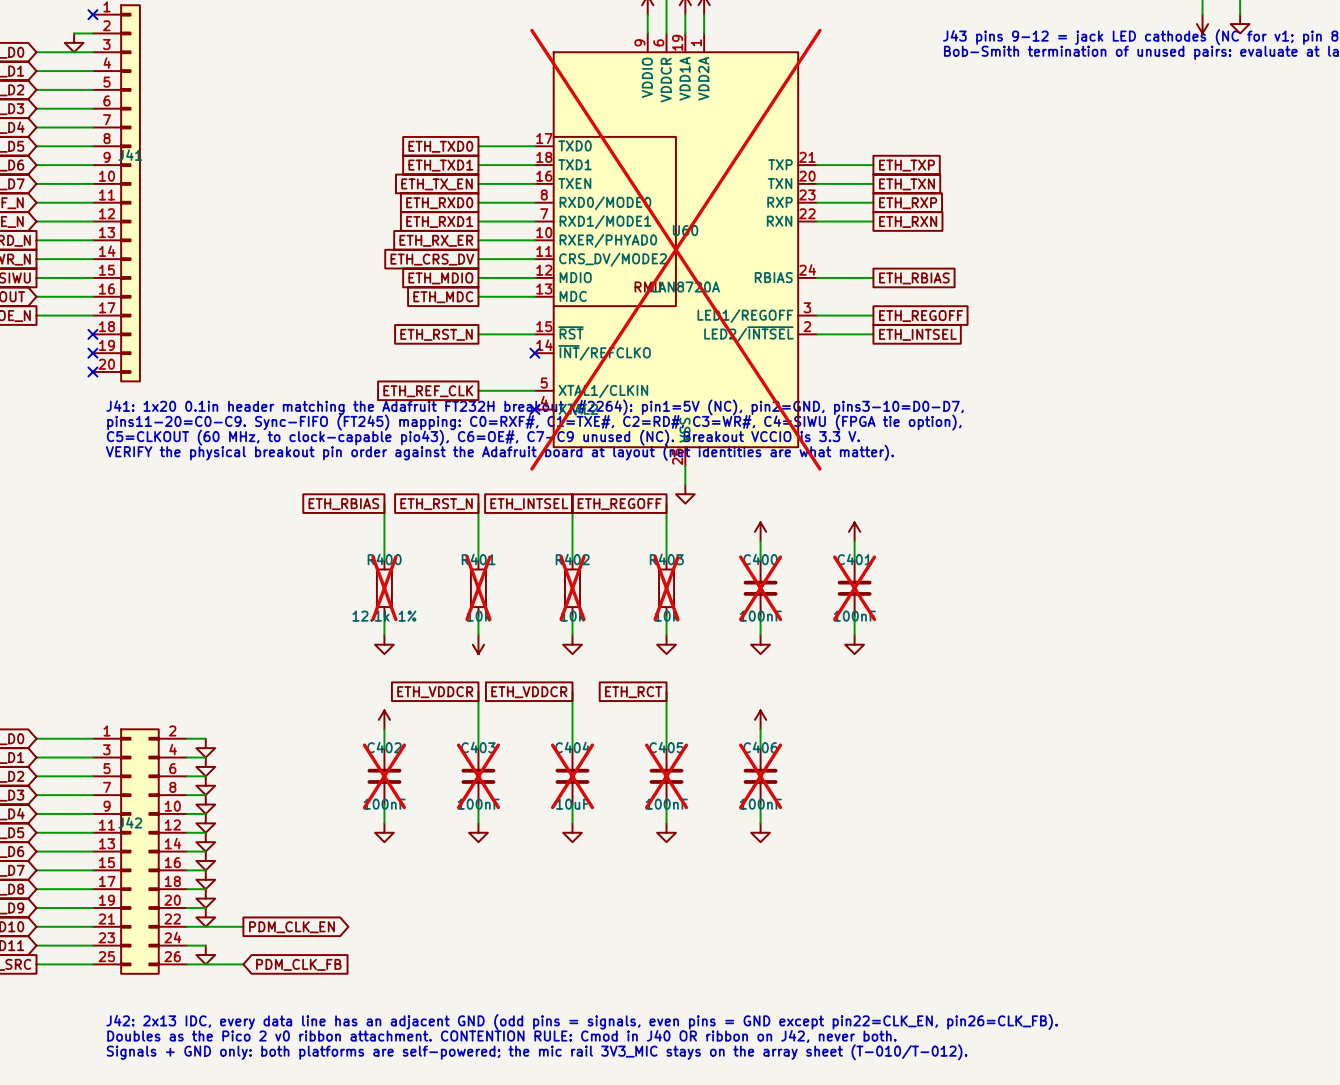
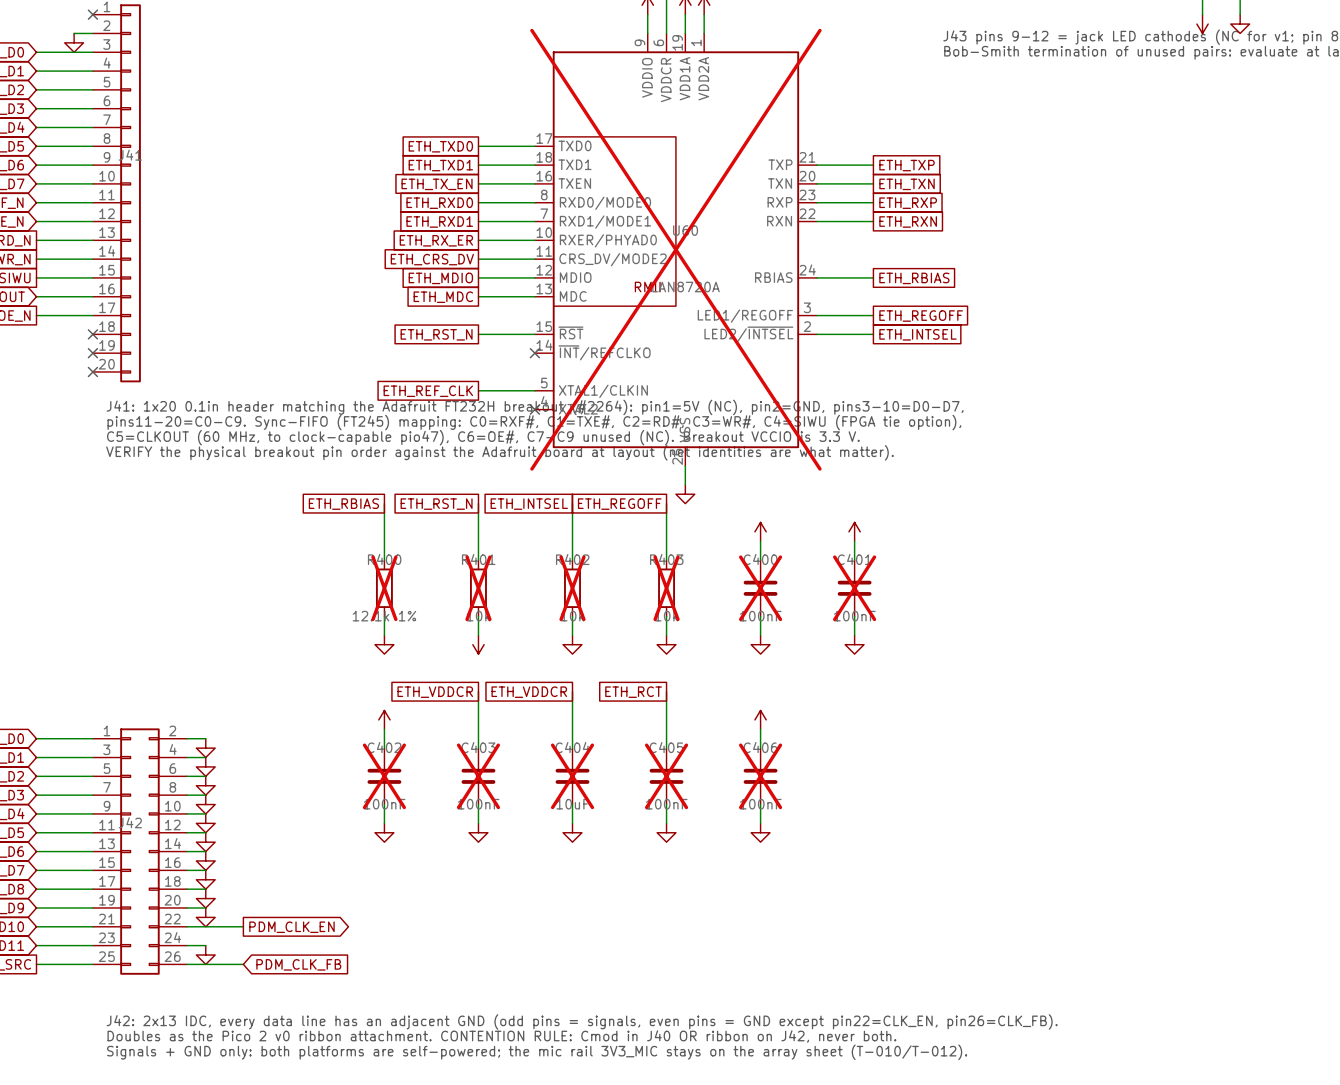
text: C5=CLKOUT (60 MHz, to clock-capable pio43), C6=OE#, C7-C9 unused (NC). Breakout VCCIO is 3.3 V. (483, 437) -> C5=CLKOUT (60 MHz, to clock-capable pio47), C6=OE#, C7-C9 unused (NC). Breakout VCCIO is 3.3 V. (483, 437)

